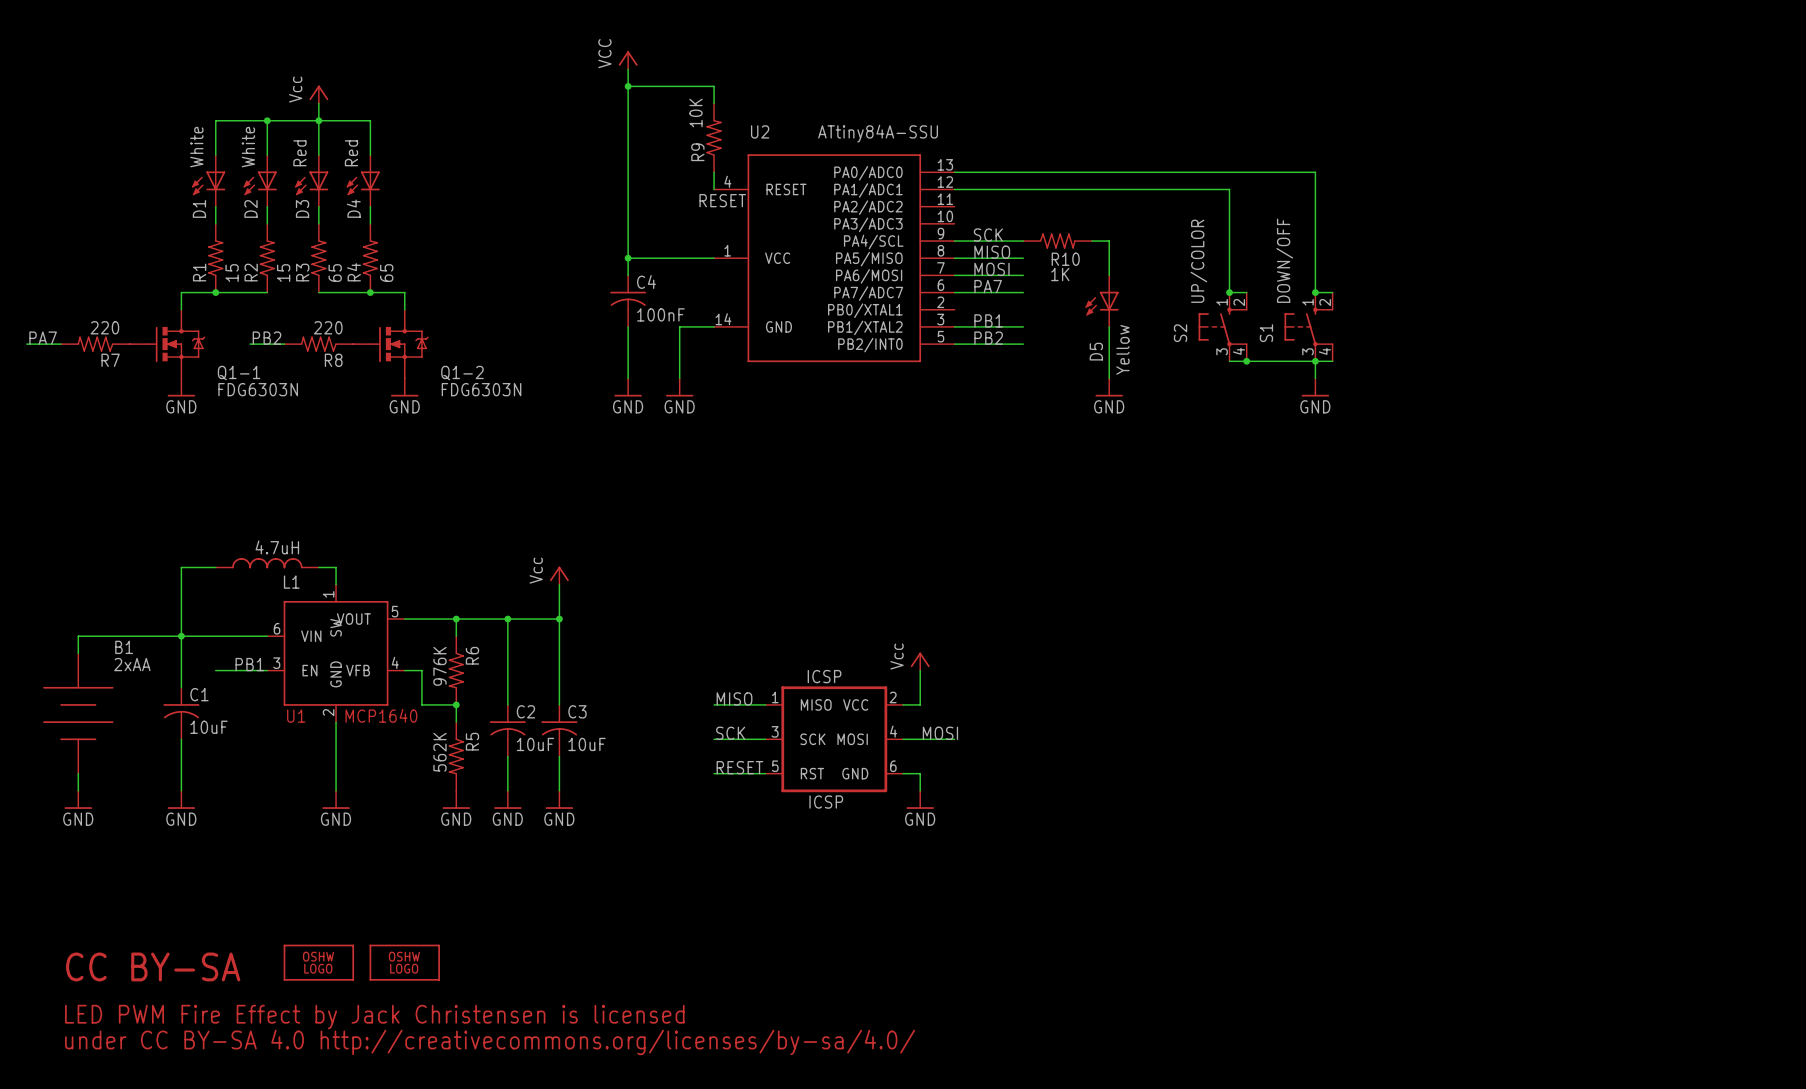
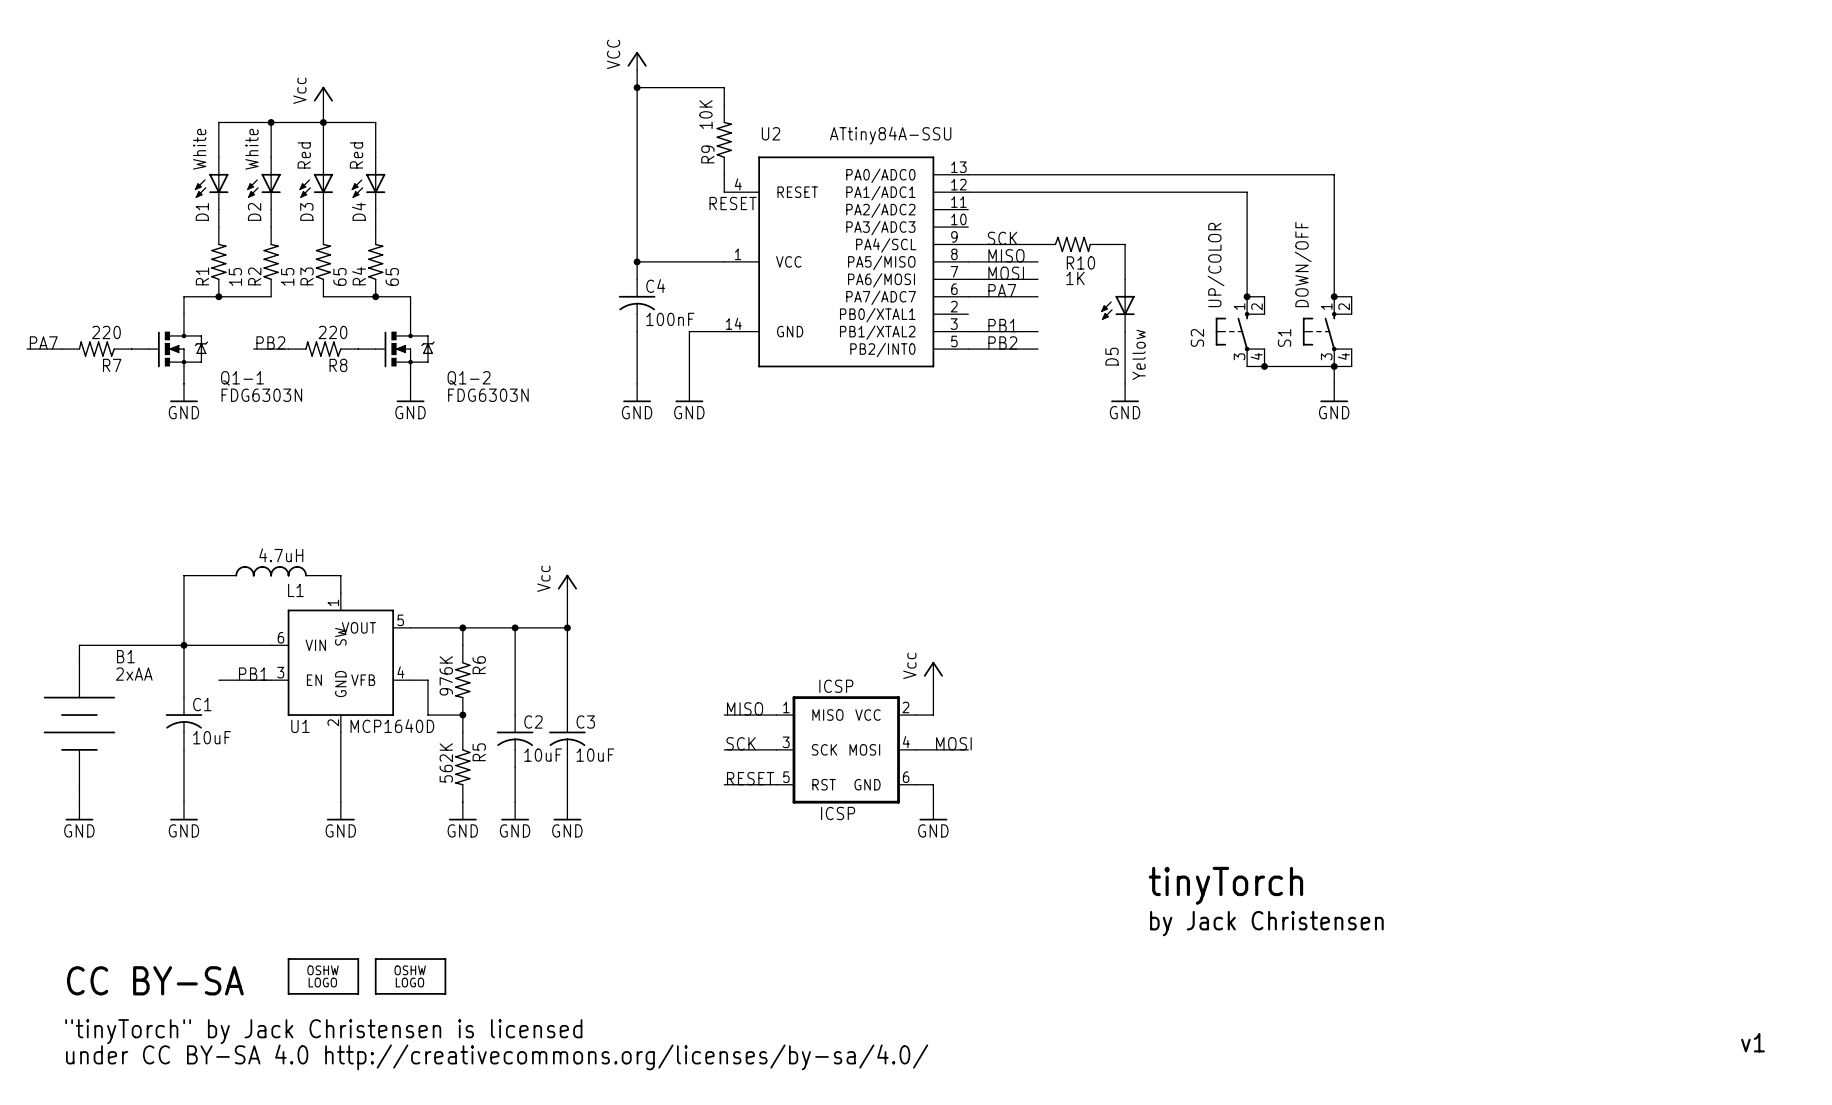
U1 value: MCP1640 (381, 715) -> MCP1640D (392, 726)
text: none -> tinyTorch (1225, 885)
text: none -> by Jack Christensen (1266, 923)
text: LED PWM Fire Effect by Jack Christensen is licensed (374, 1017) -> "tinyTorch" by Jack Christensen is licensed (323, 1031)
text: none -> v1 (1753, 1042)

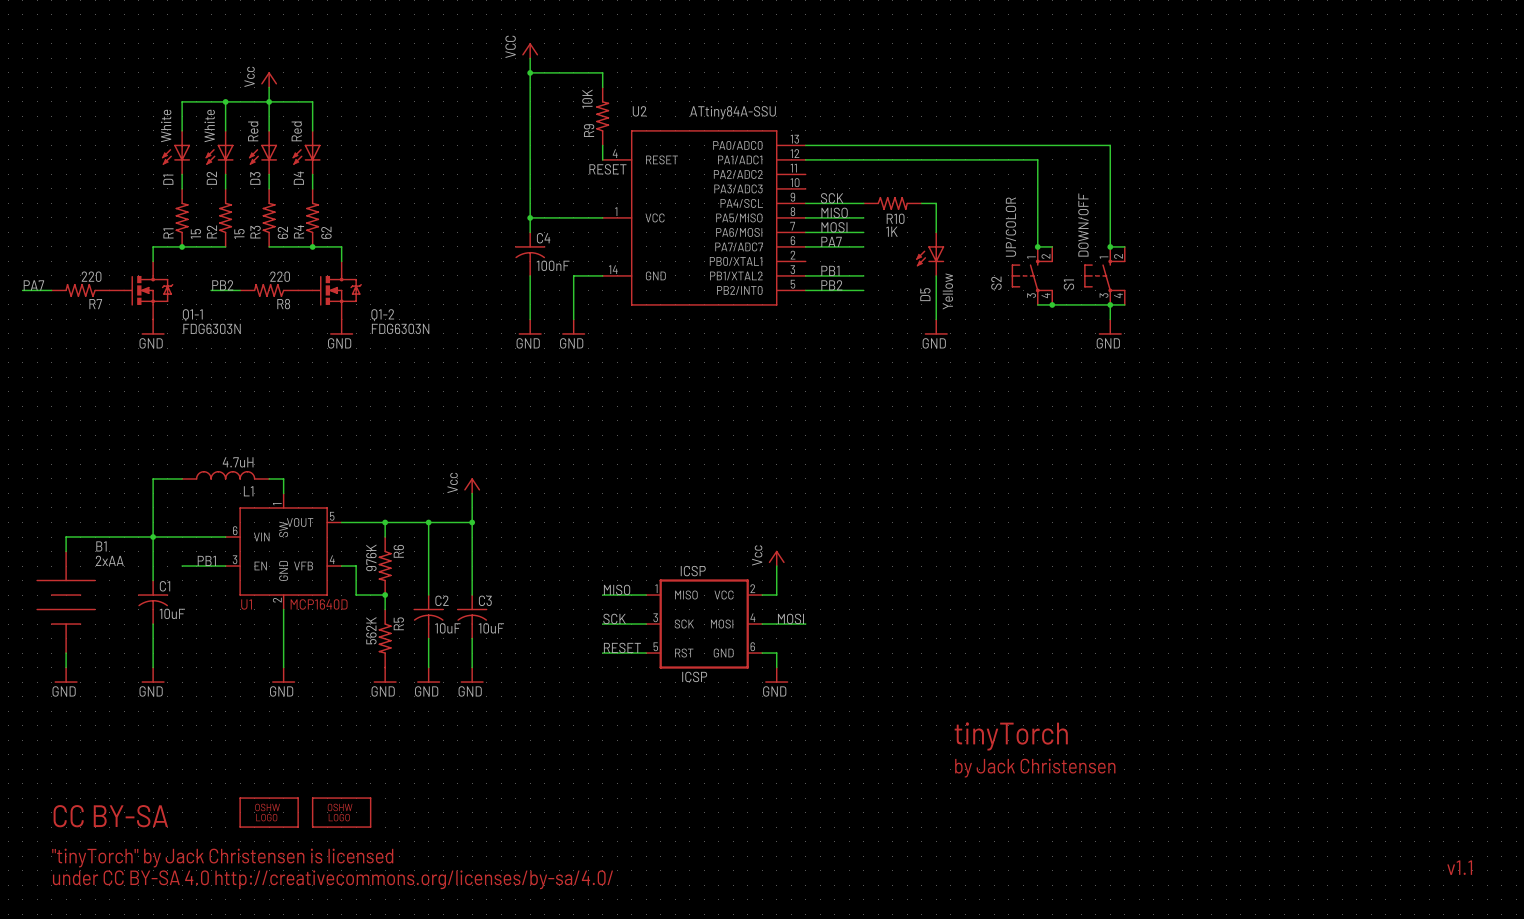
R3 value: 65 (339, 276) -> 62 (282, 232)
R4 value: 65 (392, 276) -> 62 (326, 232)
text: v1 (1753, 1042) -> v1.1 (1459, 867)

